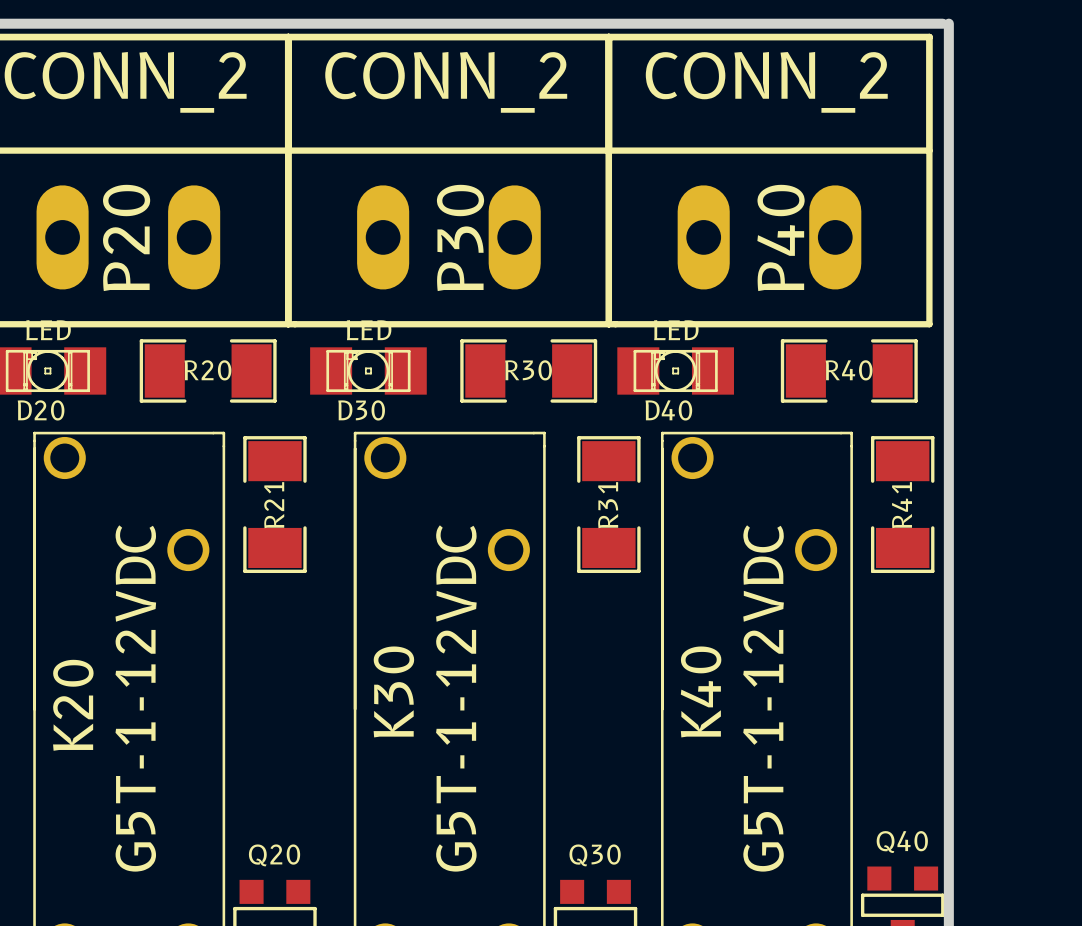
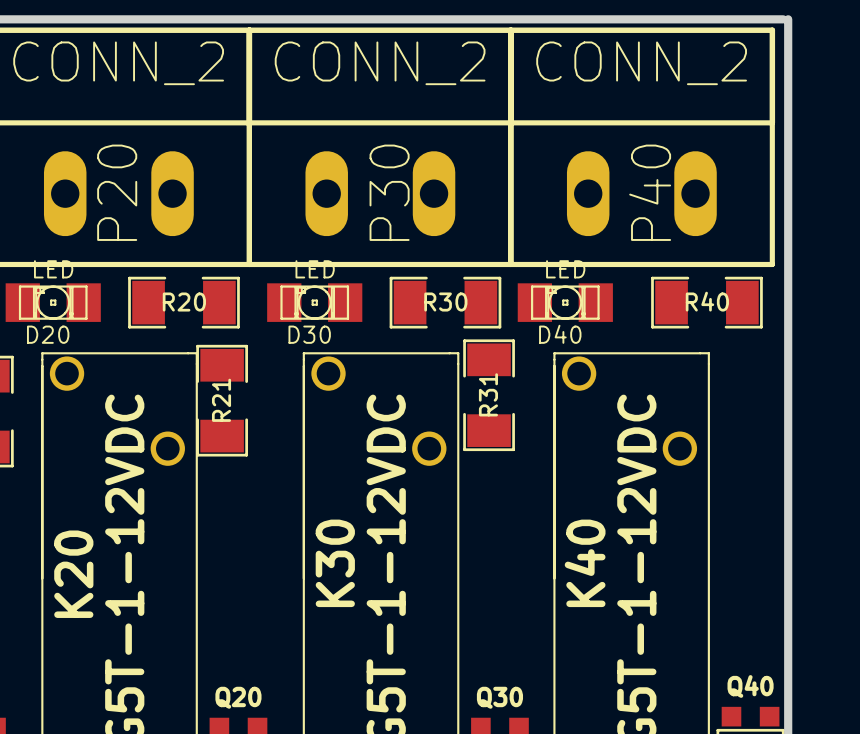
R21 position: (274, 504) -> (222, 400)
R31 position: (608, 504) -> (489, 395)
R41: (902, 504) -> none

